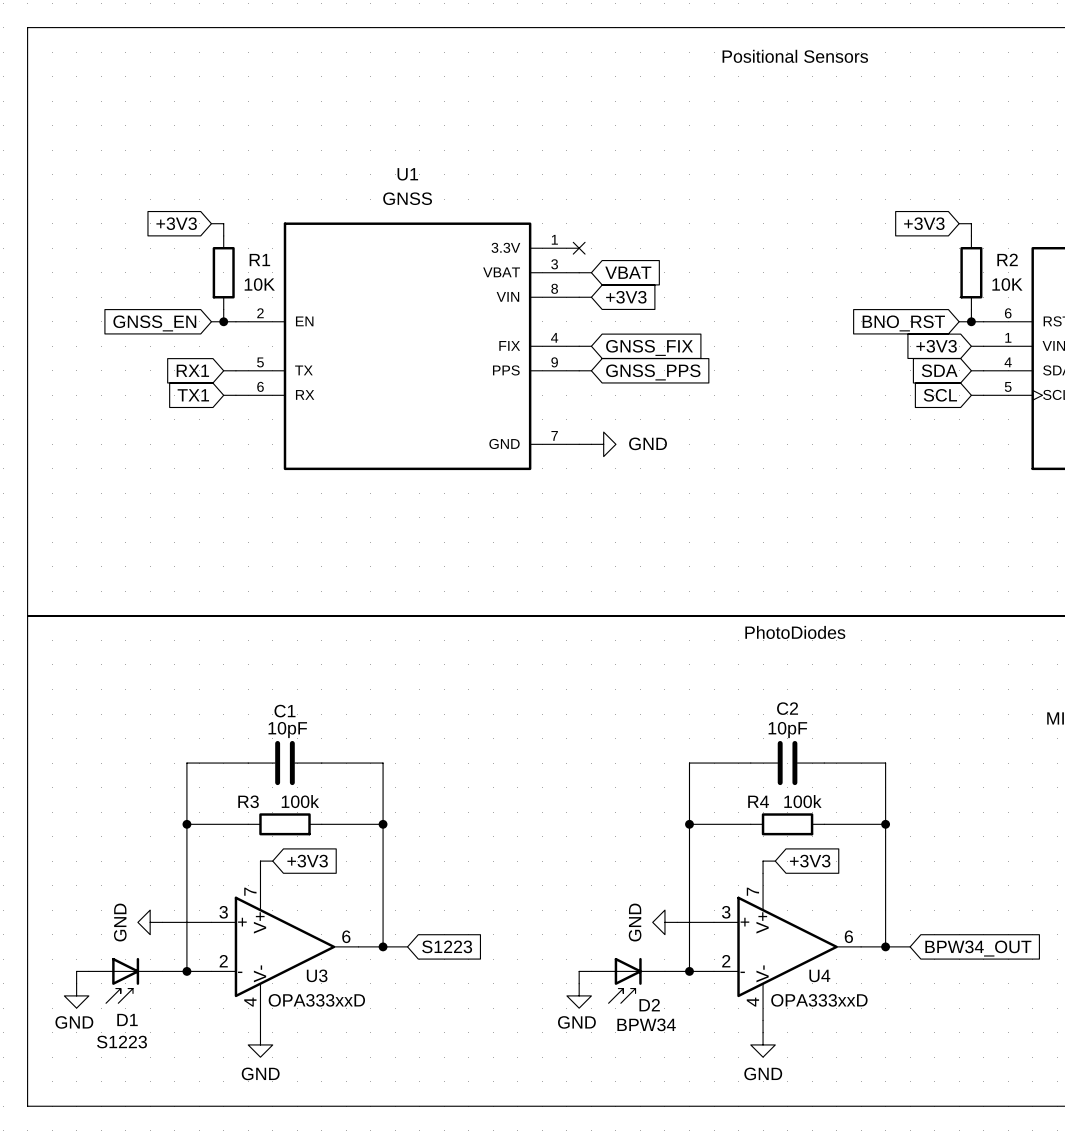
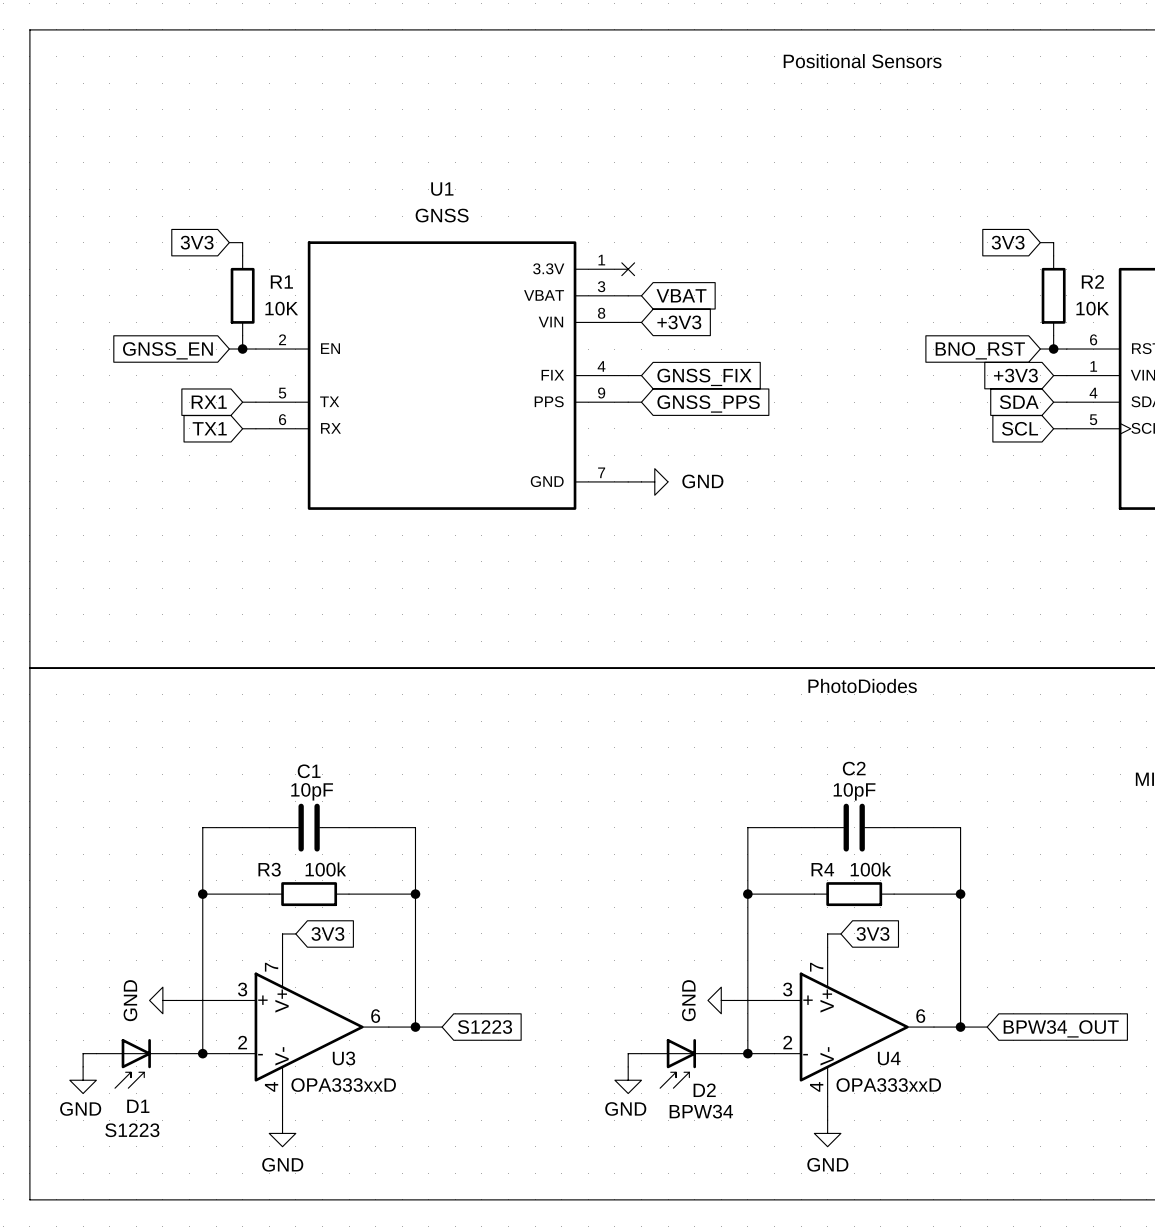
global label: +3V3 (176, 223) -> 3V3 (197, 242)
global label: +3V3 (924, 223) -> 3V3 (1008, 242)
global label: +3V3 (307, 861) -> 3V3 (327, 933)
global label: +3V3 (810, 861) -> 3V3 (873, 933)

